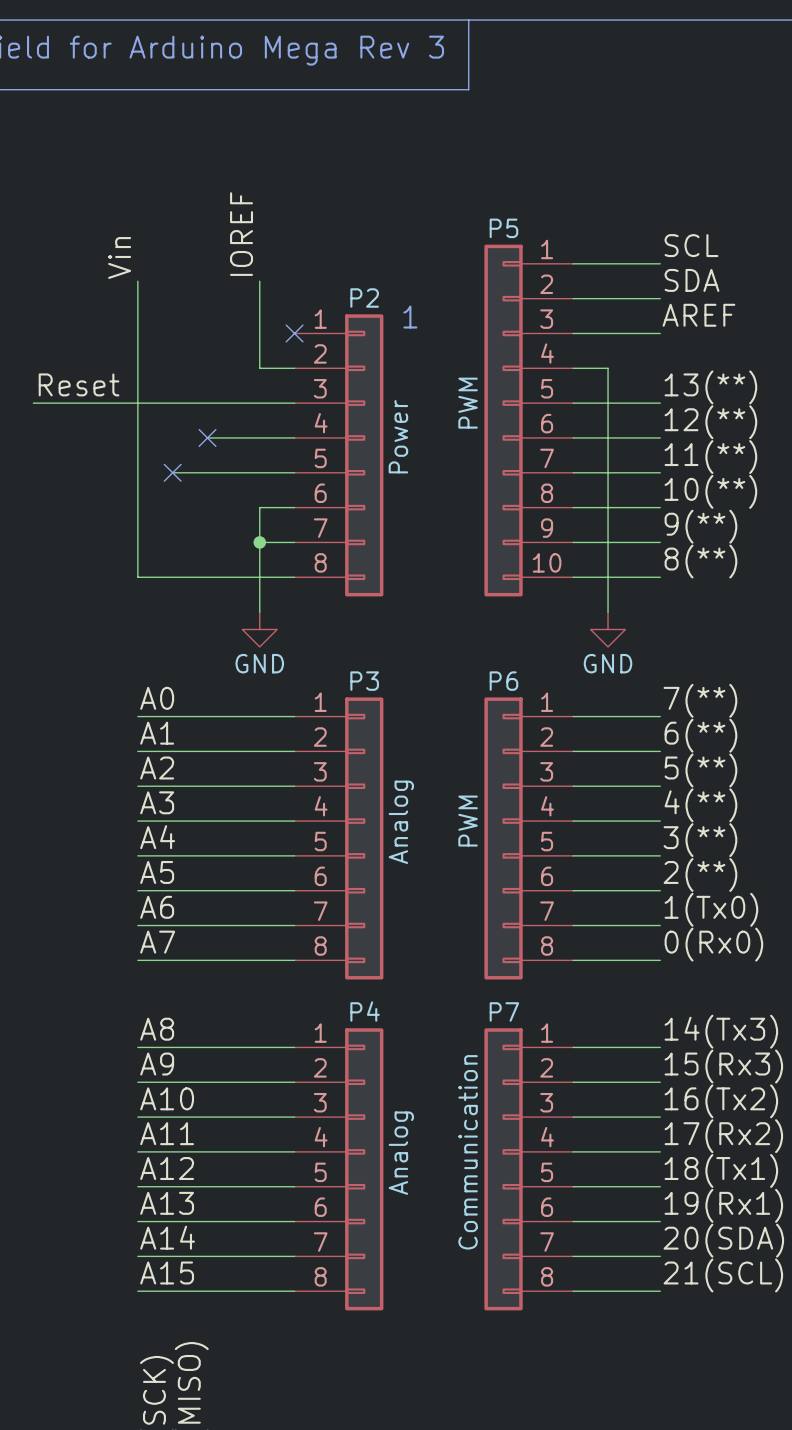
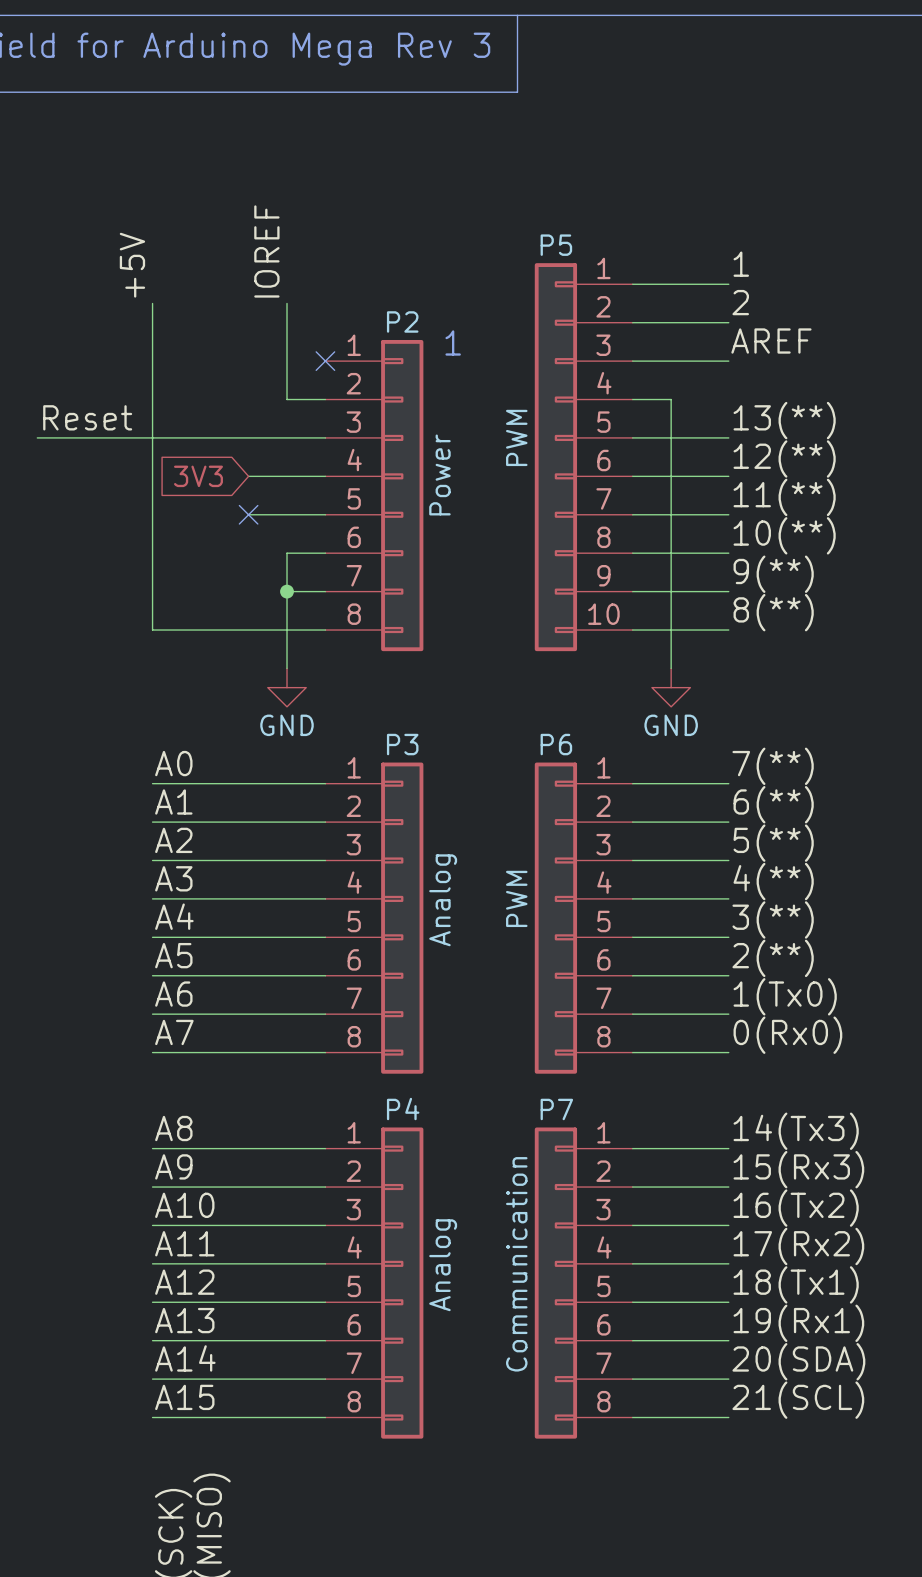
label: SCL (691, 245) -> 1 (741, 264)
label: Vin (119, 257) -> +5V (132, 265)
label: SDA (691, 280) -> 2 (740, 302)
global label: none -> 3V3 (198, 476)
wire: (207, 437) (224, 437) -> none
no-connect mark: (207, 437) -> none
wire: (172, 472) (224, 472) -> none
no-connect mark: (172, 472) -> none
no-connect mark: none -> (248, 514)

